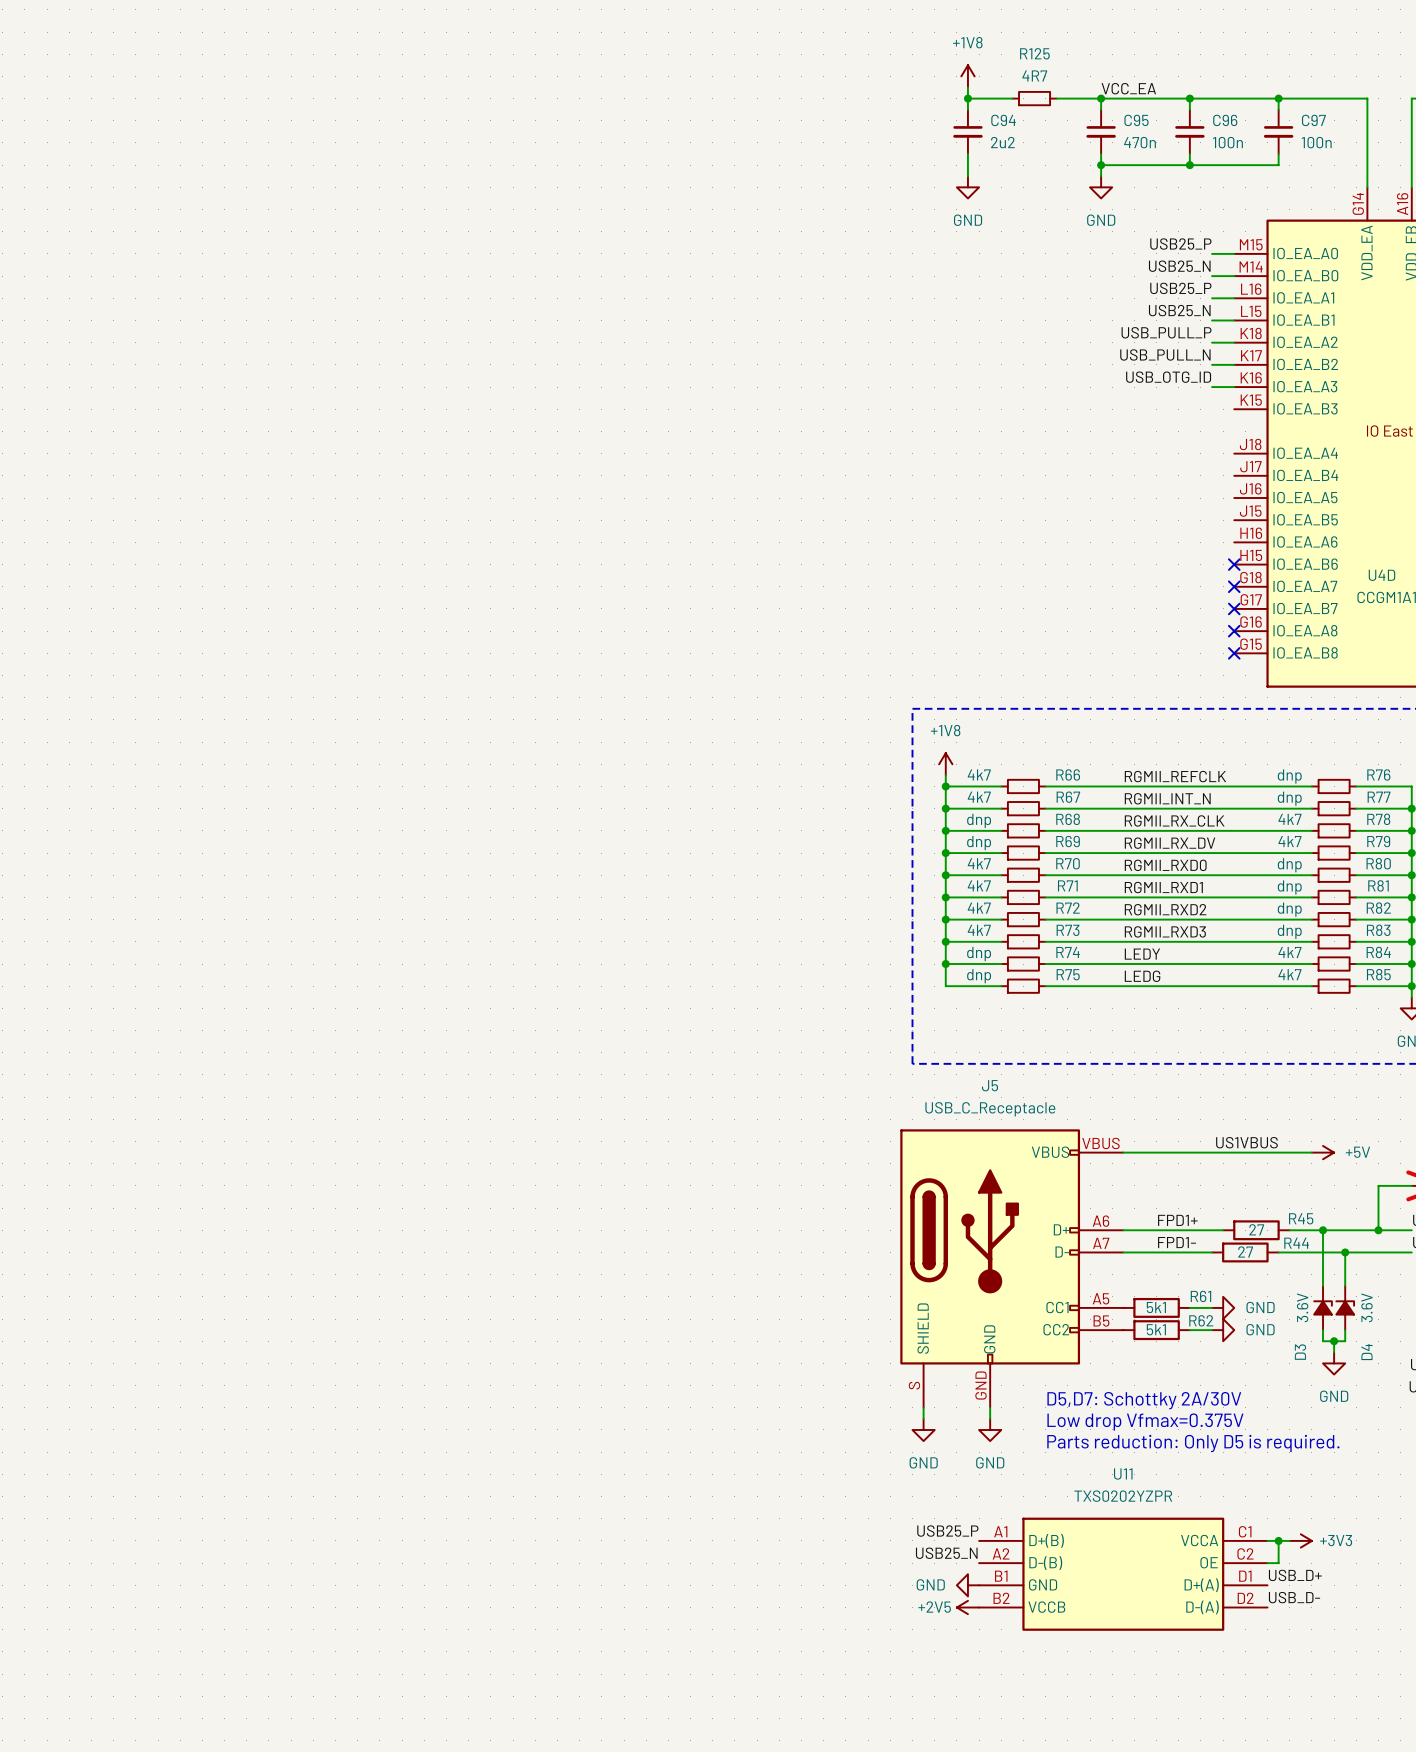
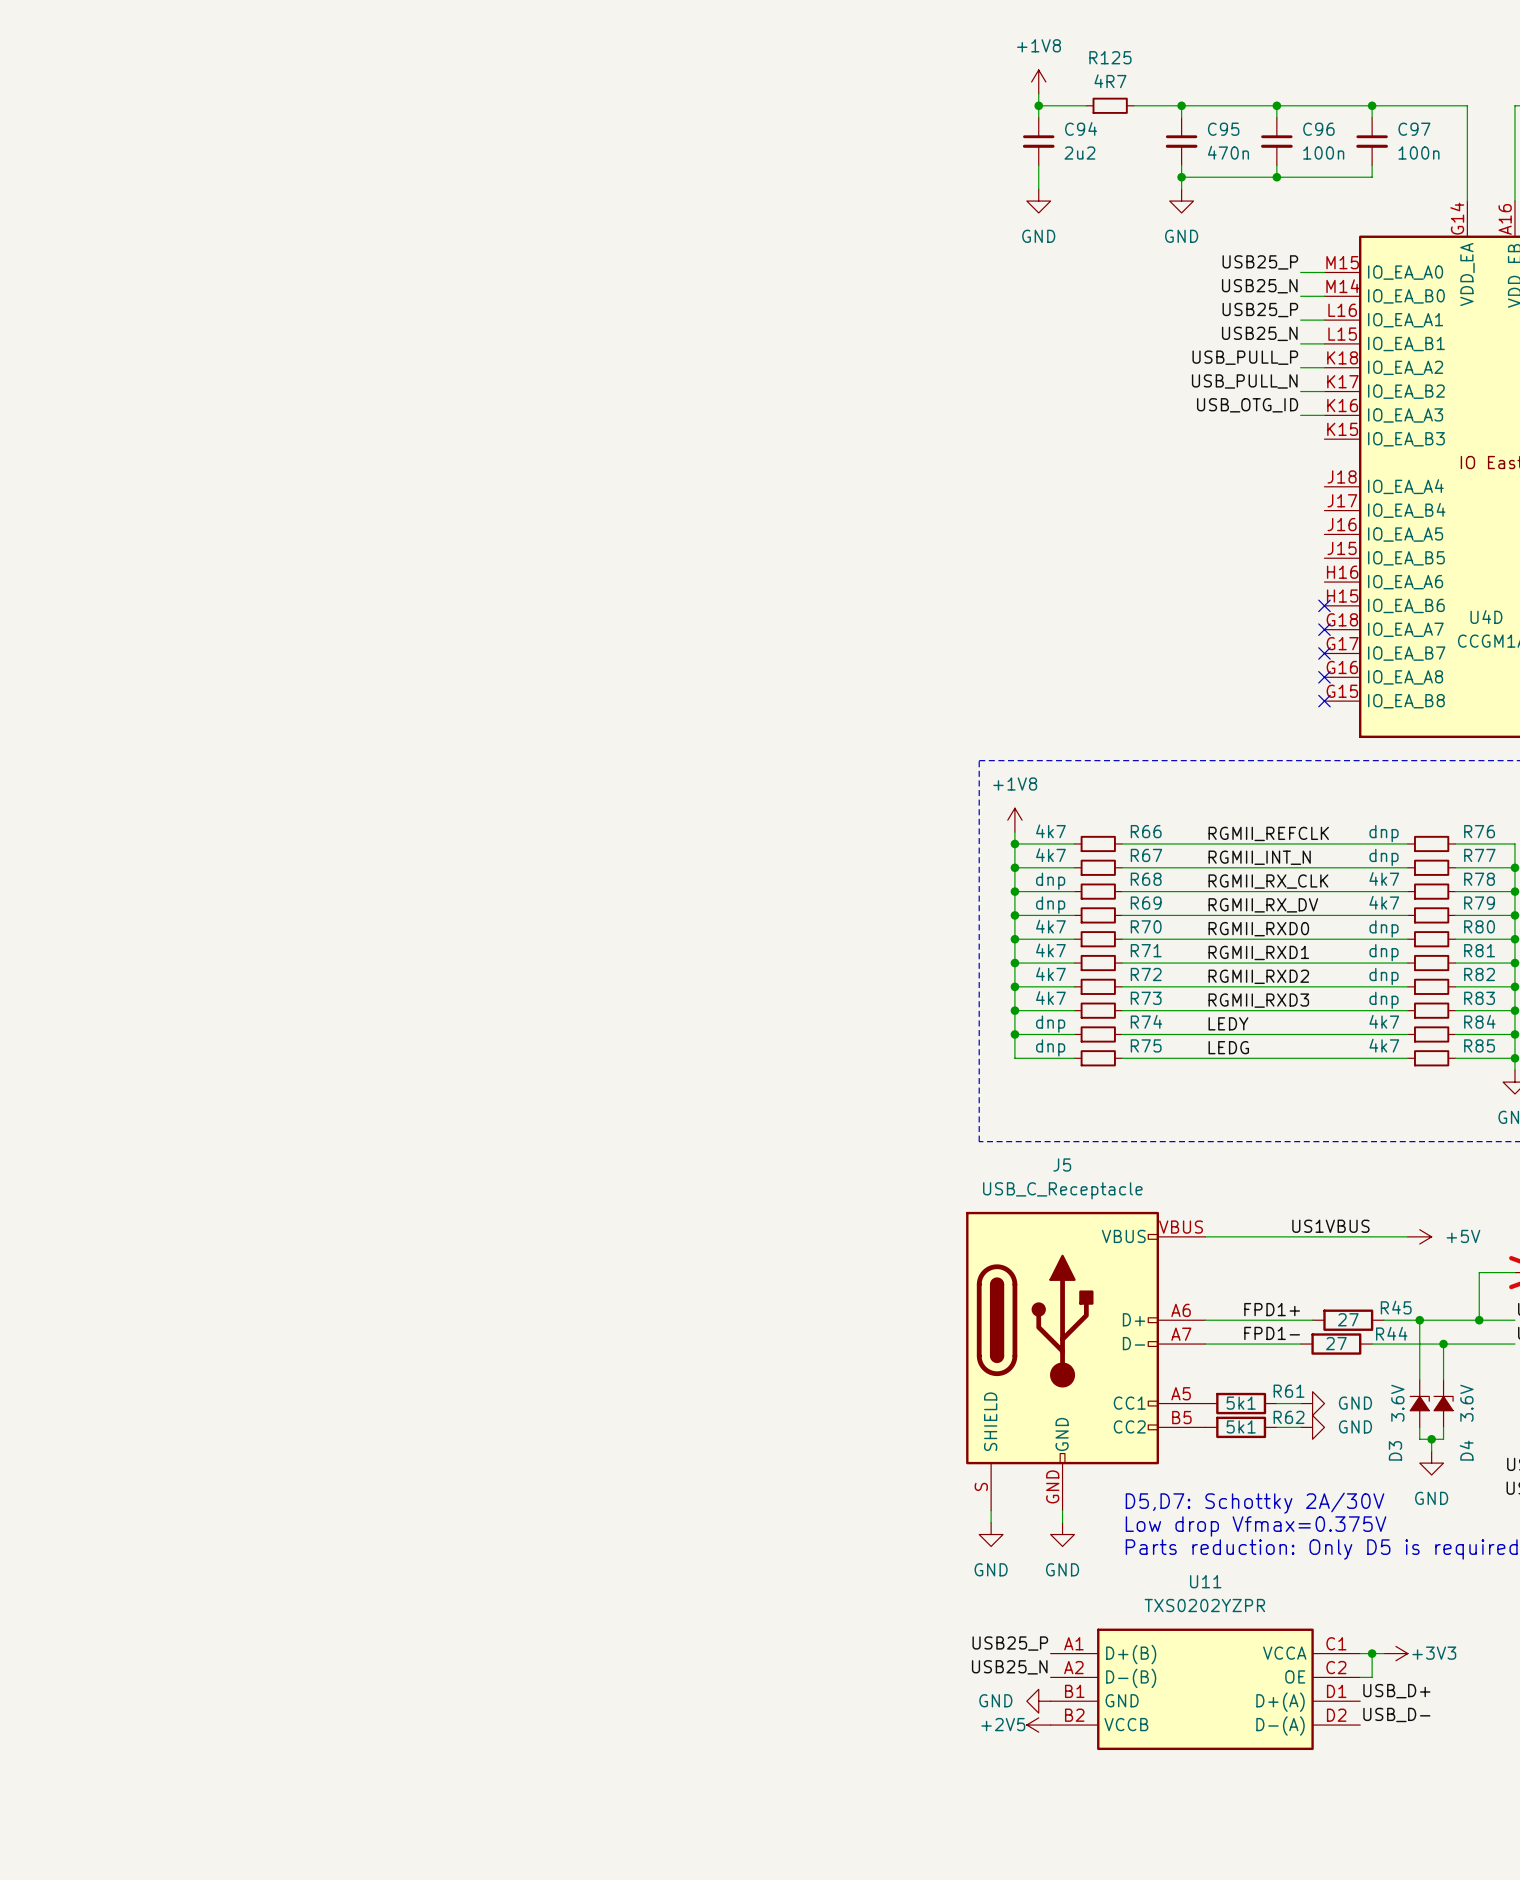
label: VCC_EA (1128, 88) -> none

